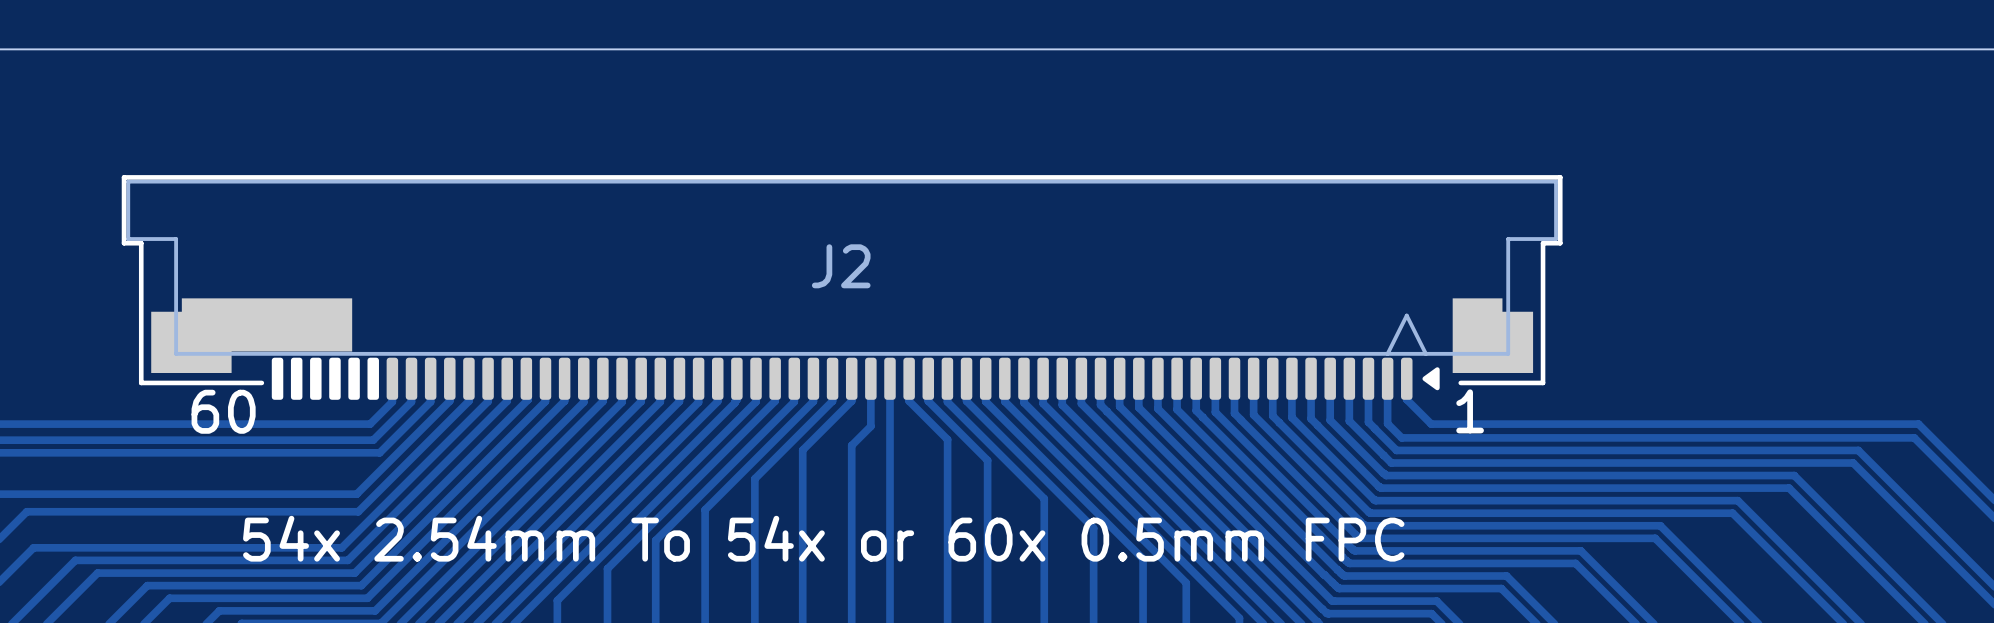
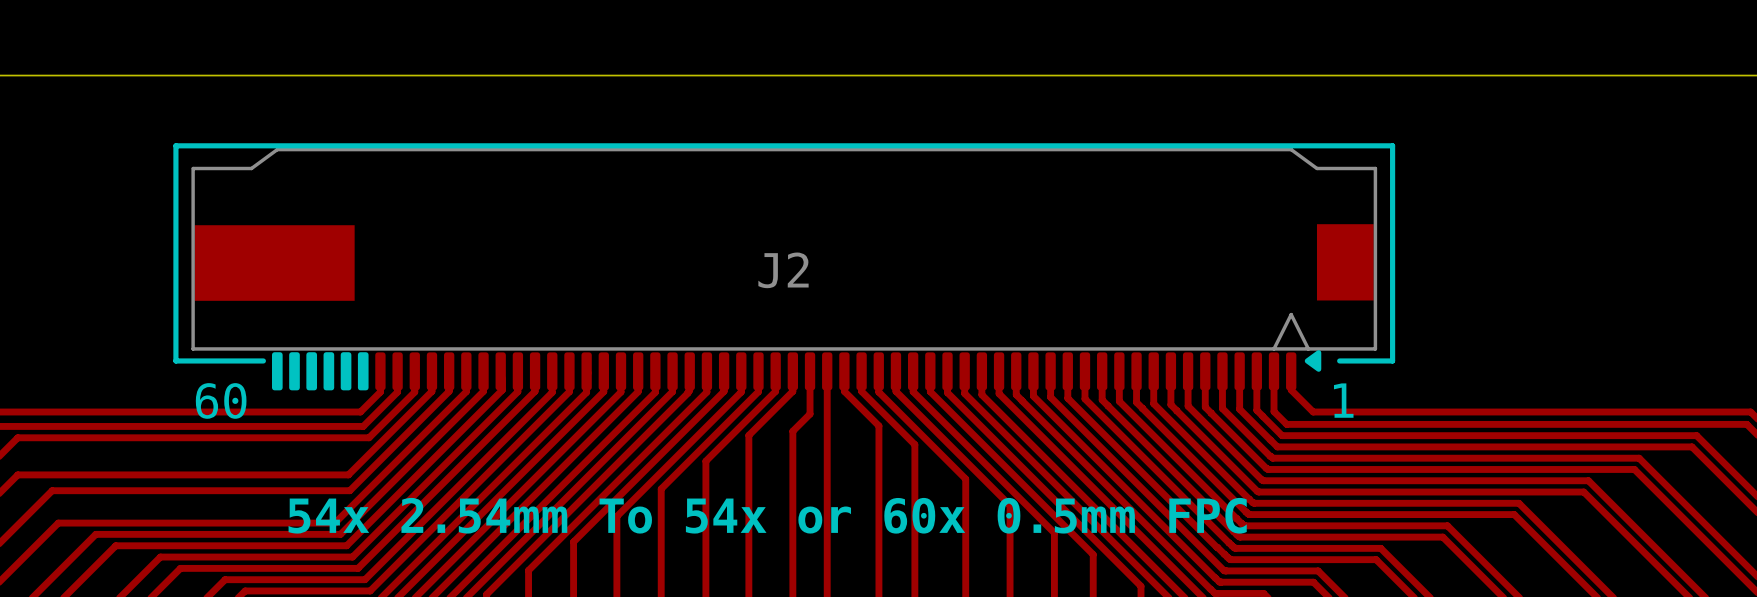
J2 footprint: [121, 175, 1563, 400] -> [173, 143, 1396, 391]

